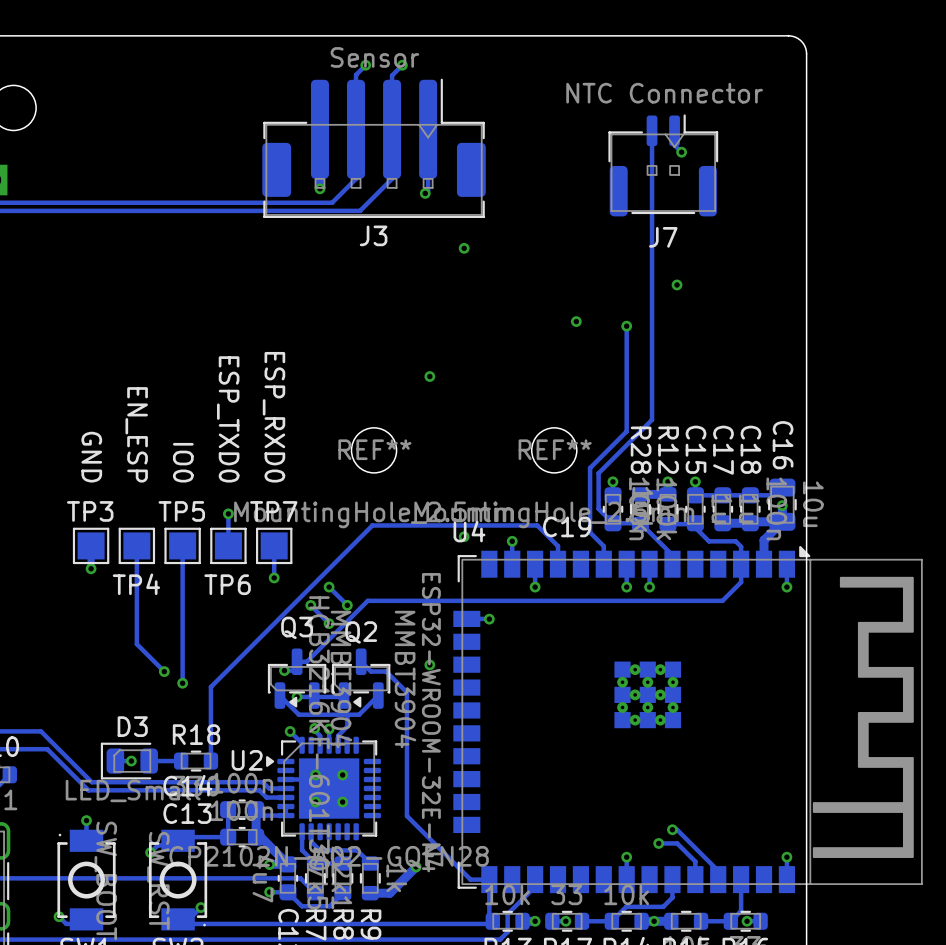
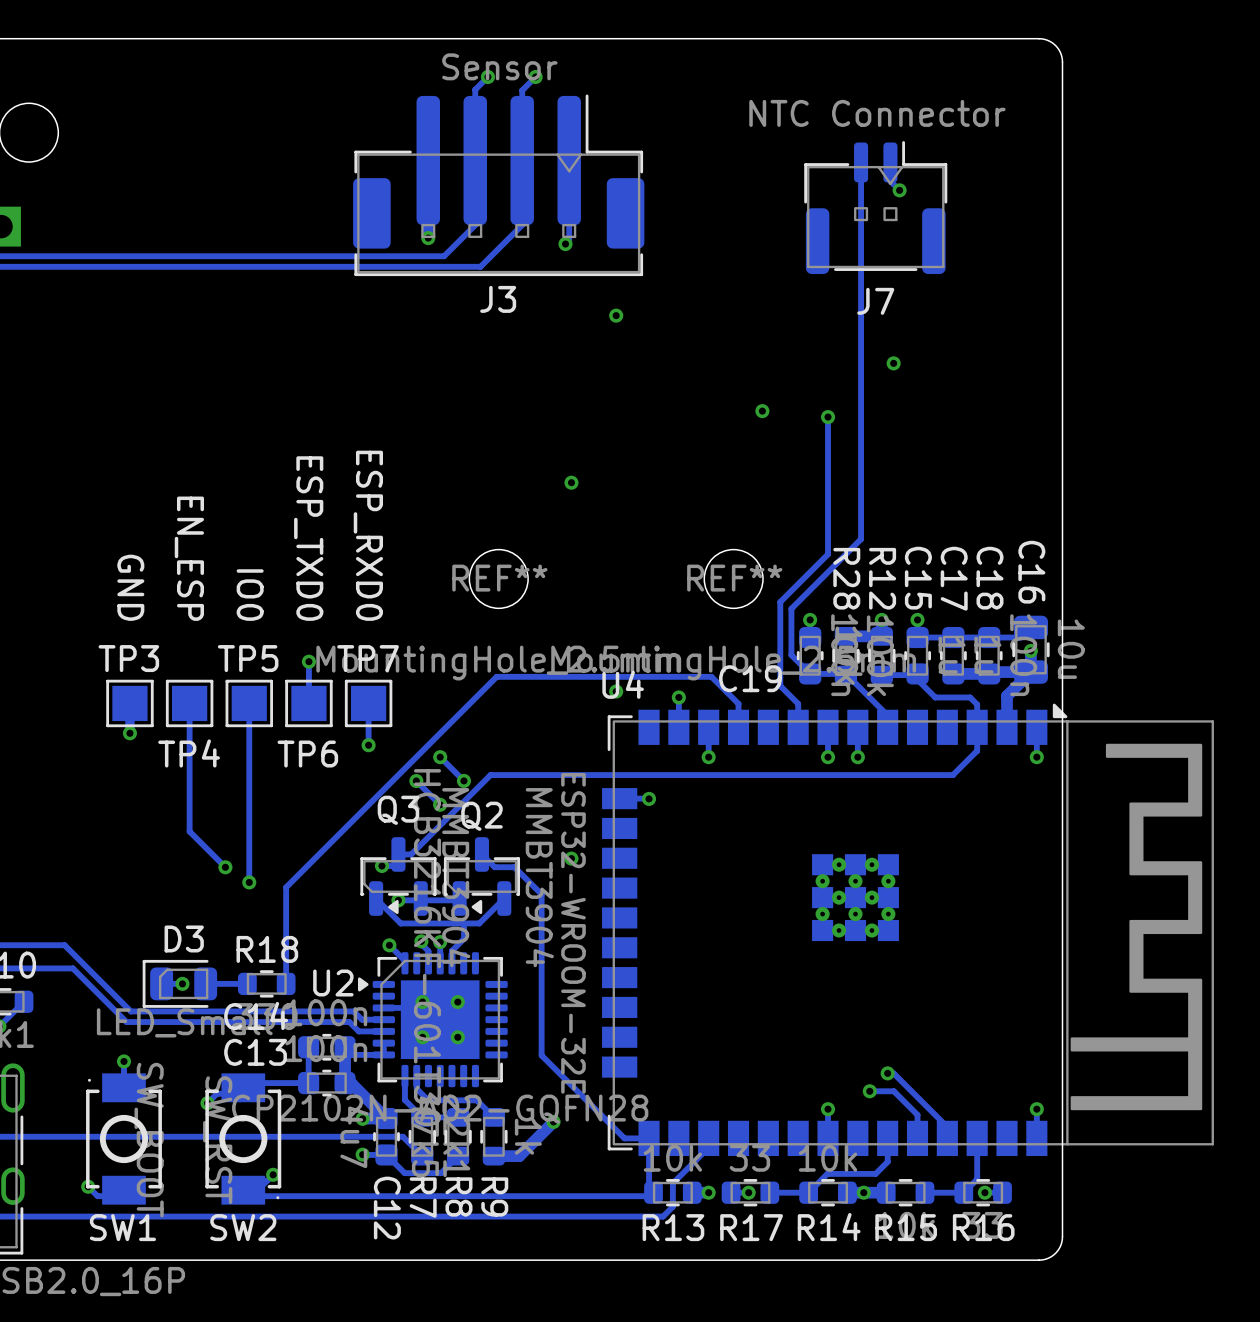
U4 value: ESP32-WROOM-32E-N4 (431, 722) -> ESP32-WROOM-32E (573, 933)

